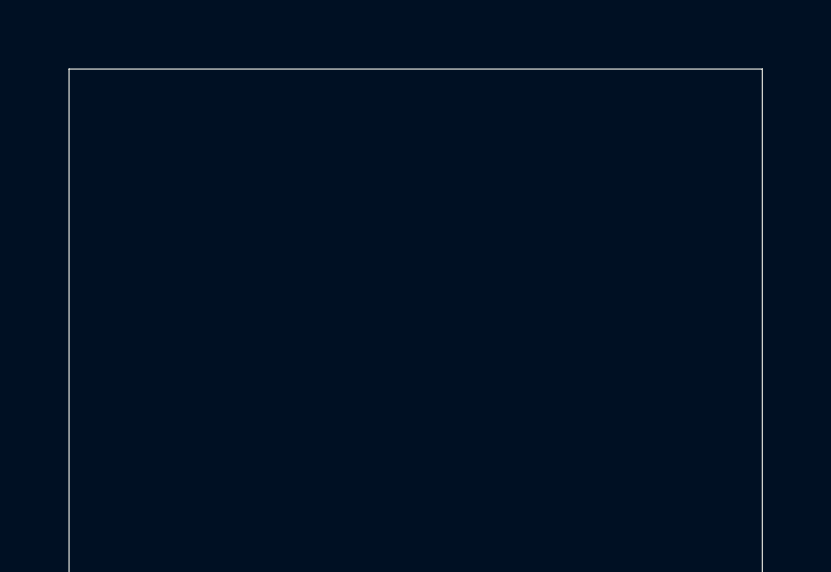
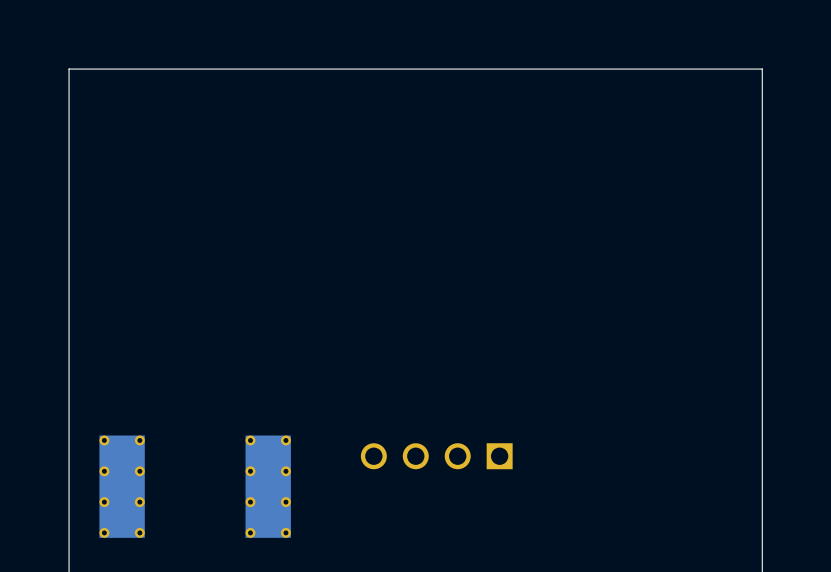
part: none -> (436, 456)
part: none -> (122, 486)
part: none -> (268, 486)

